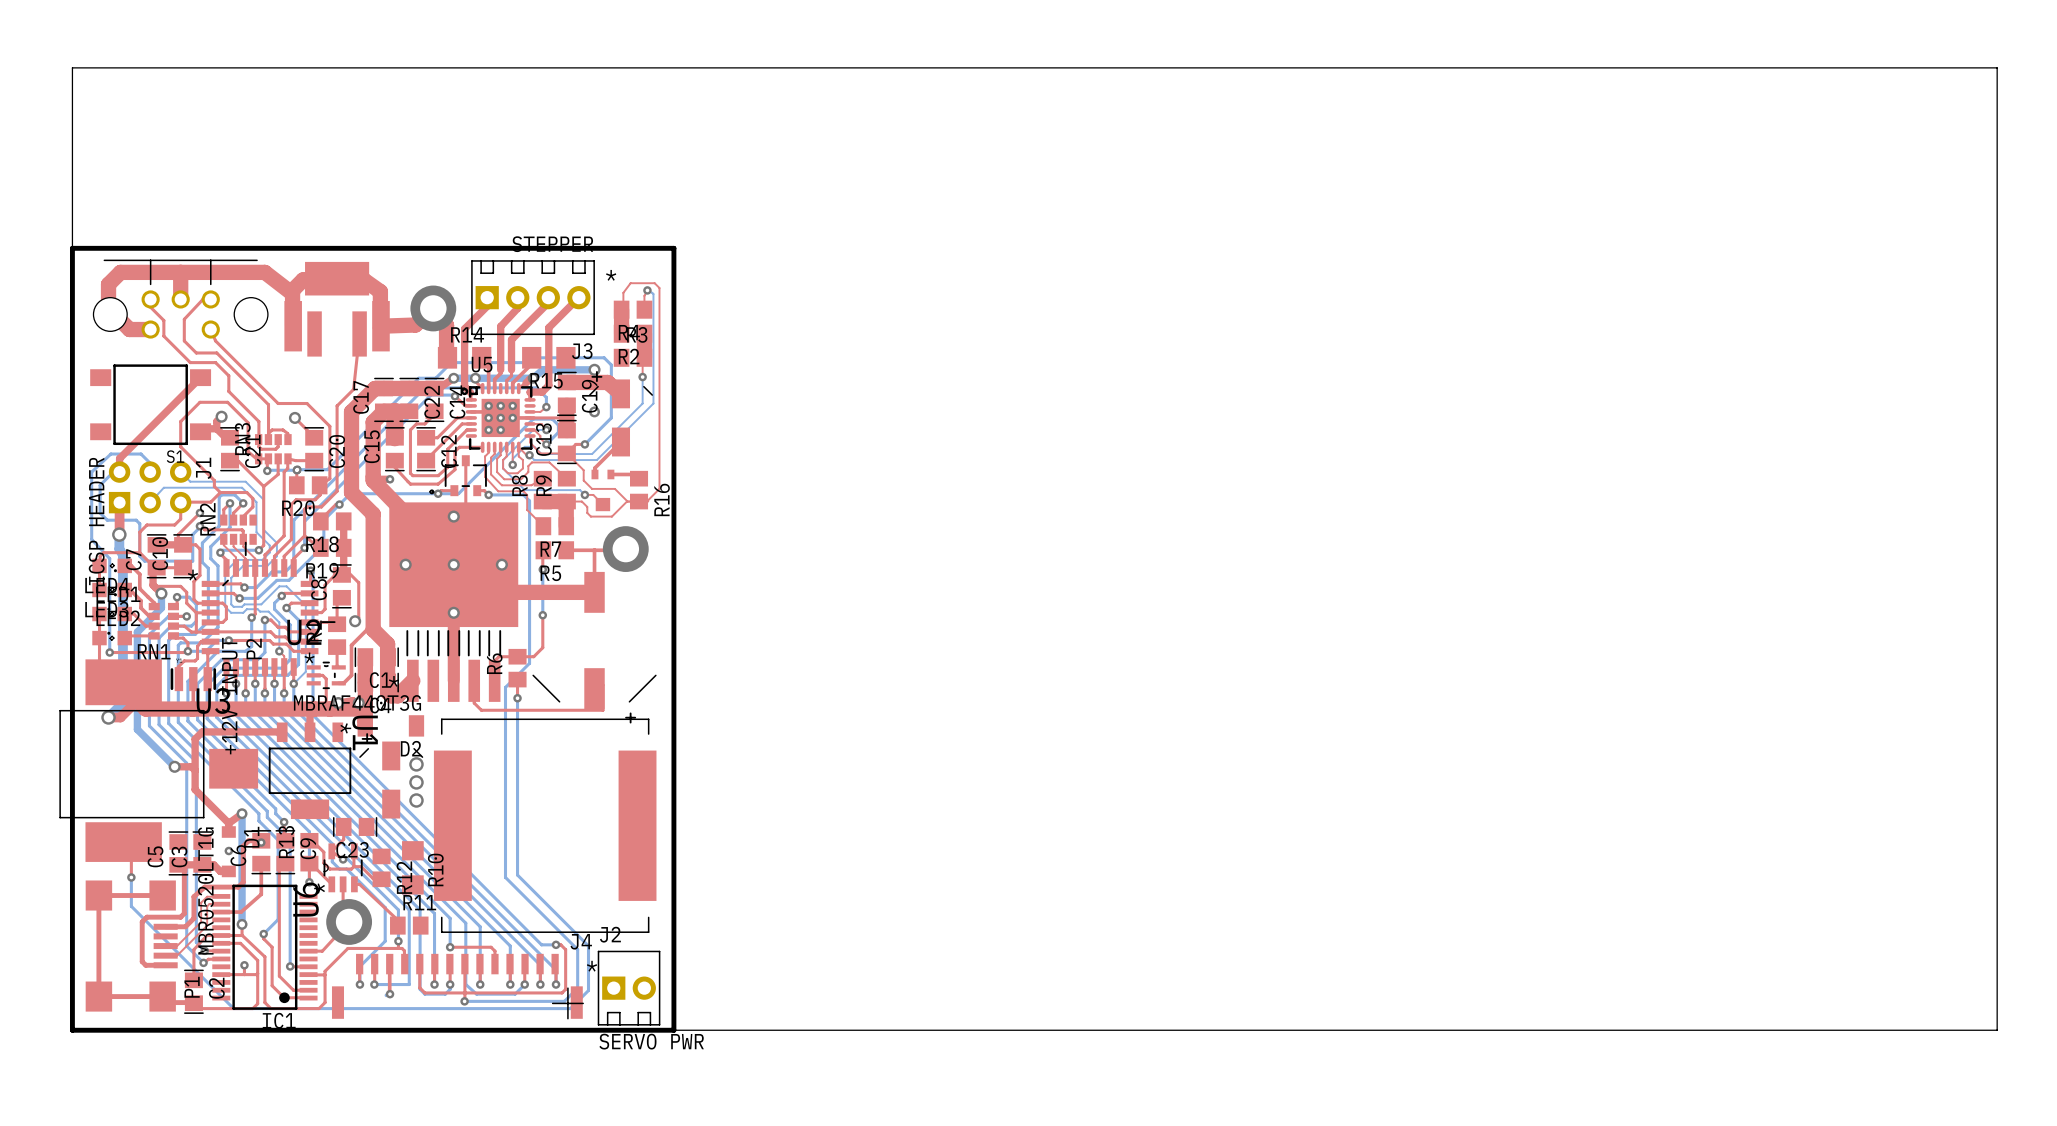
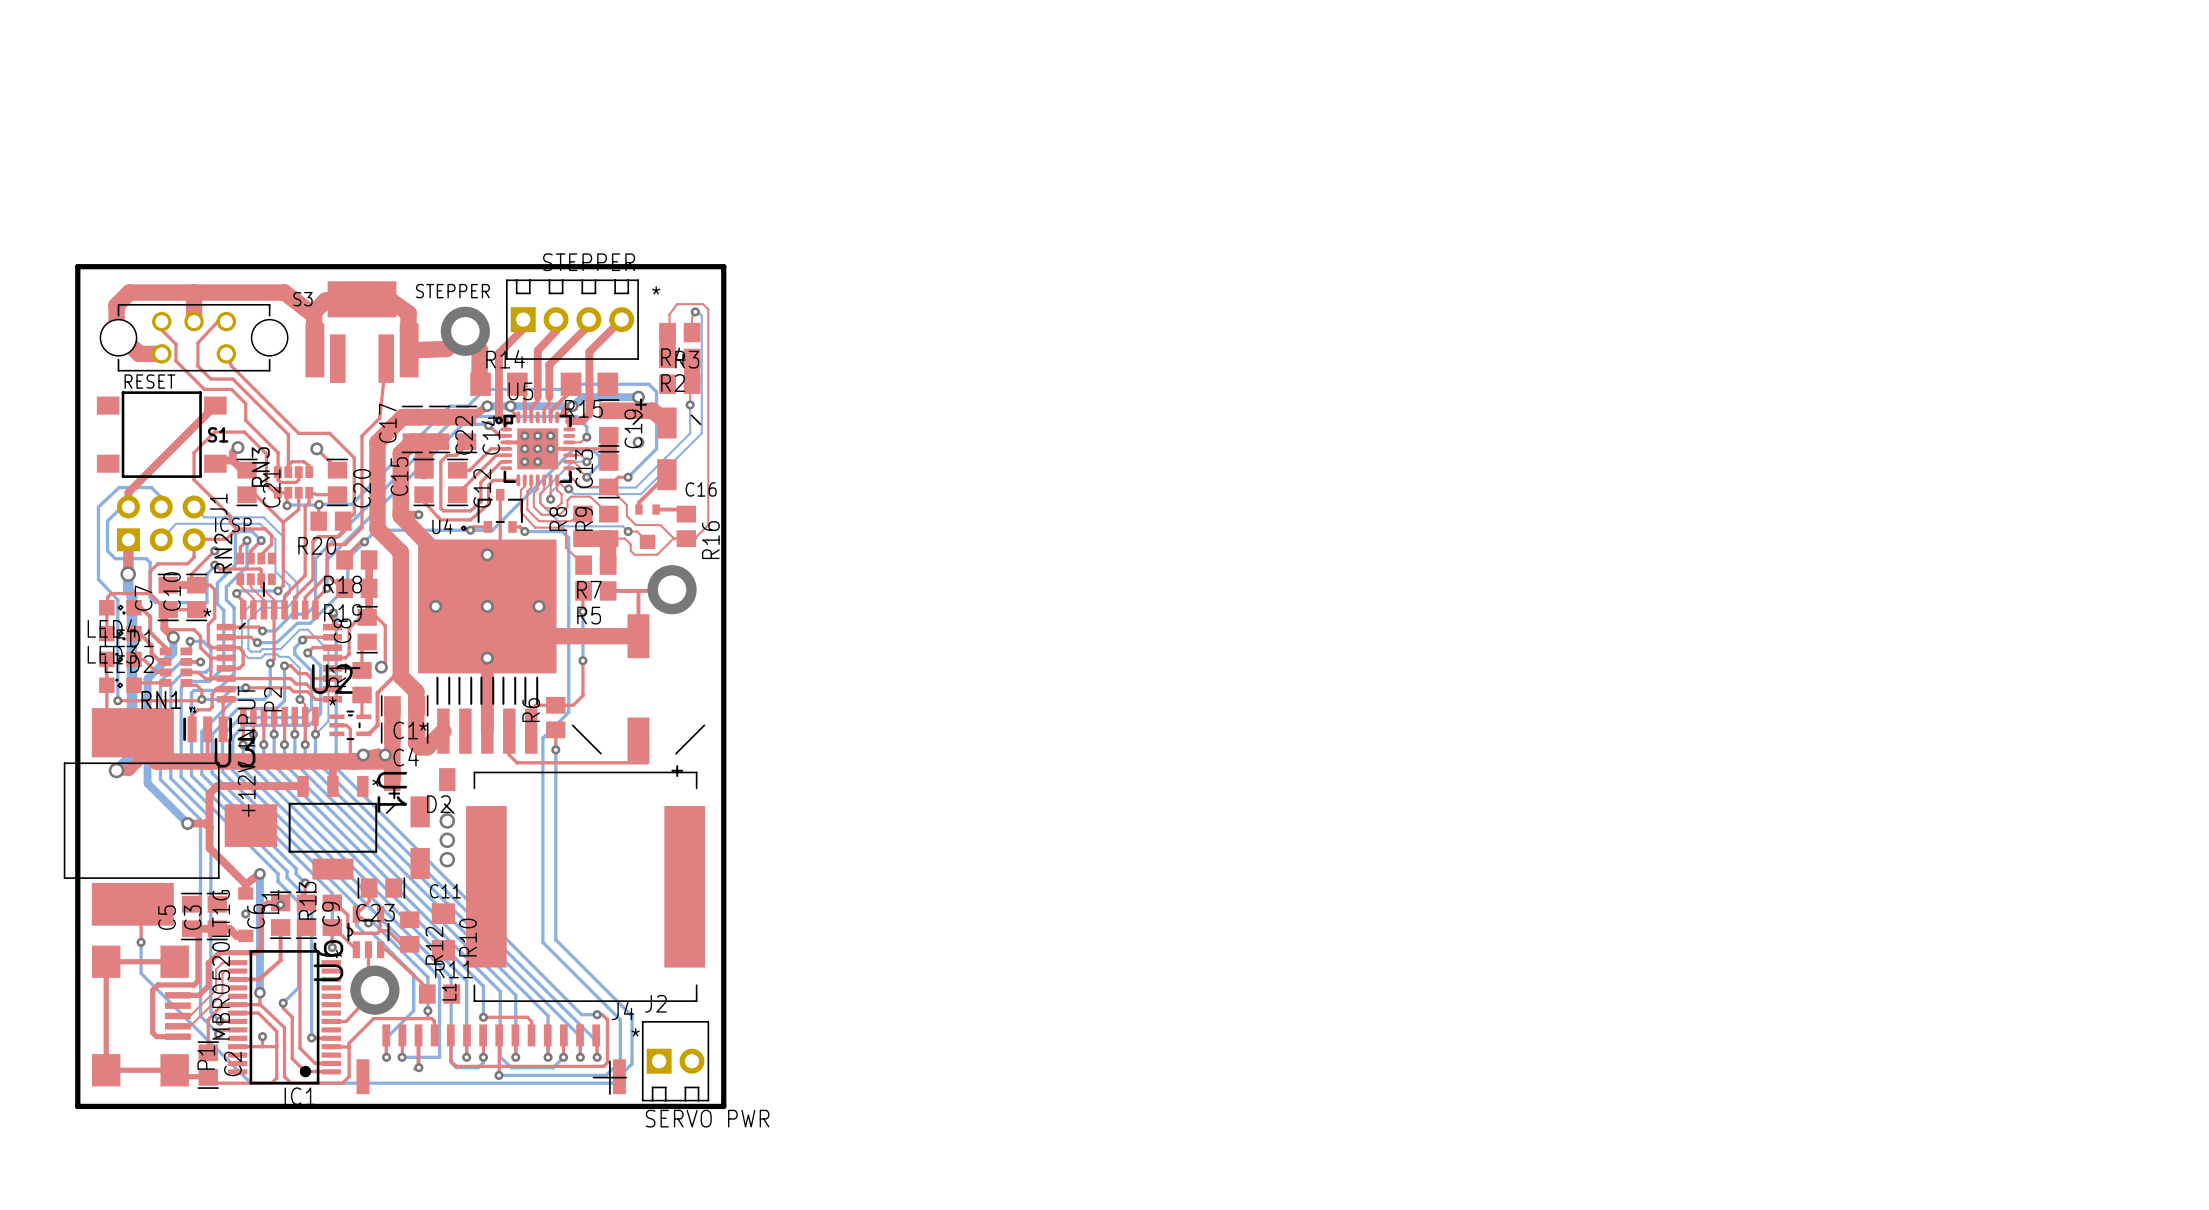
board edge: (72, 248) (72, 67) (1997, 67) (1997, 1030) (673, 1030) -> none
text: none -> STEPPER (452, 291)
S3 name: none -> S3 (303, 299)
part: (180, 299) -> none
part: none -> (194, 337)
J3 name: J3 (582, 351) -> none
text: none -> RESET (149, 381)
C16 name: none -> C16 (701, 489)
S1 name position: S1 (175, 456) -> S1 (218, 434)
text: none -> ICSP (233, 524)
U4 name: none -> U4 (442, 526)
J1 value: ICSP HEADER (96, 521) -> none
D2 value: MBRAF440T3G (357, 702) -> none
C11 name: none -> C11 (445, 891)
L1 name: none -> L1 (449, 992)

